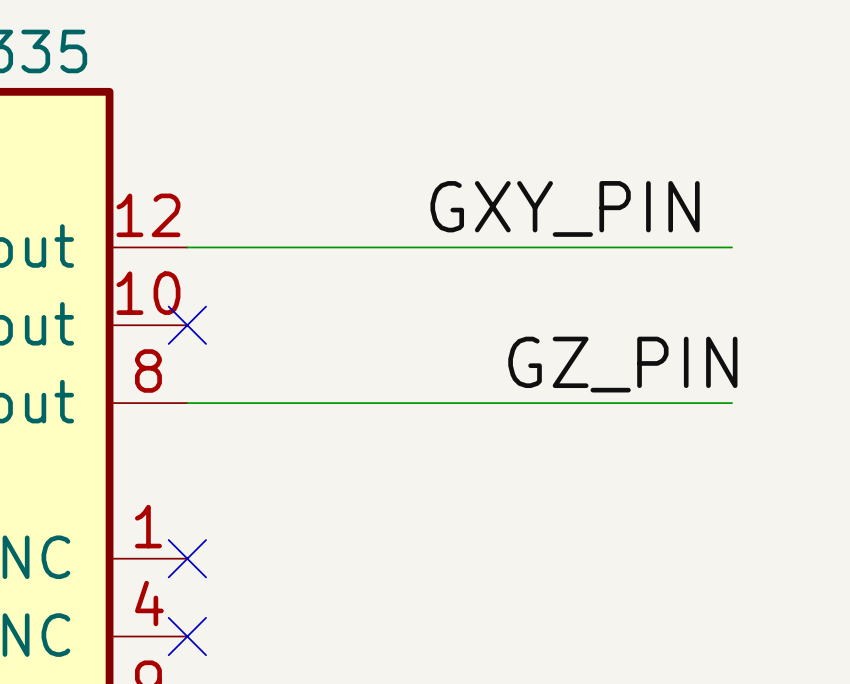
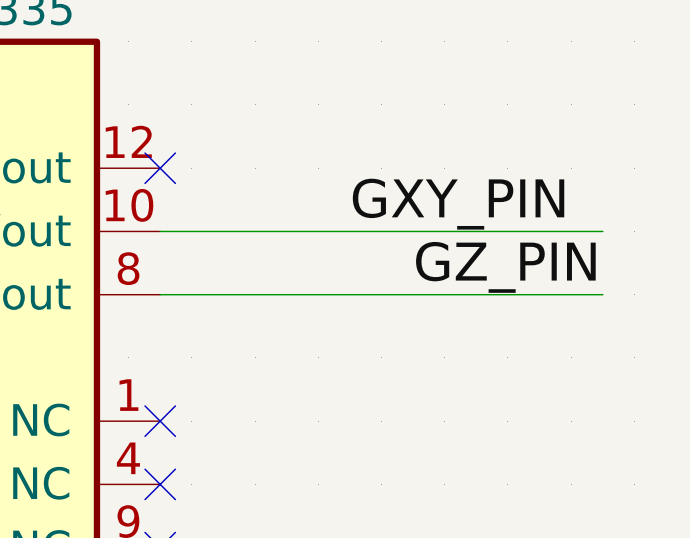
label position: GXY_PIN (565, 208) -> GXY_PIN (458, 204)
wire: (187, 247) (732, 247) -> (160, 231) (602, 231)
no-connect mark position: (187, 325) -> (160, 168)

